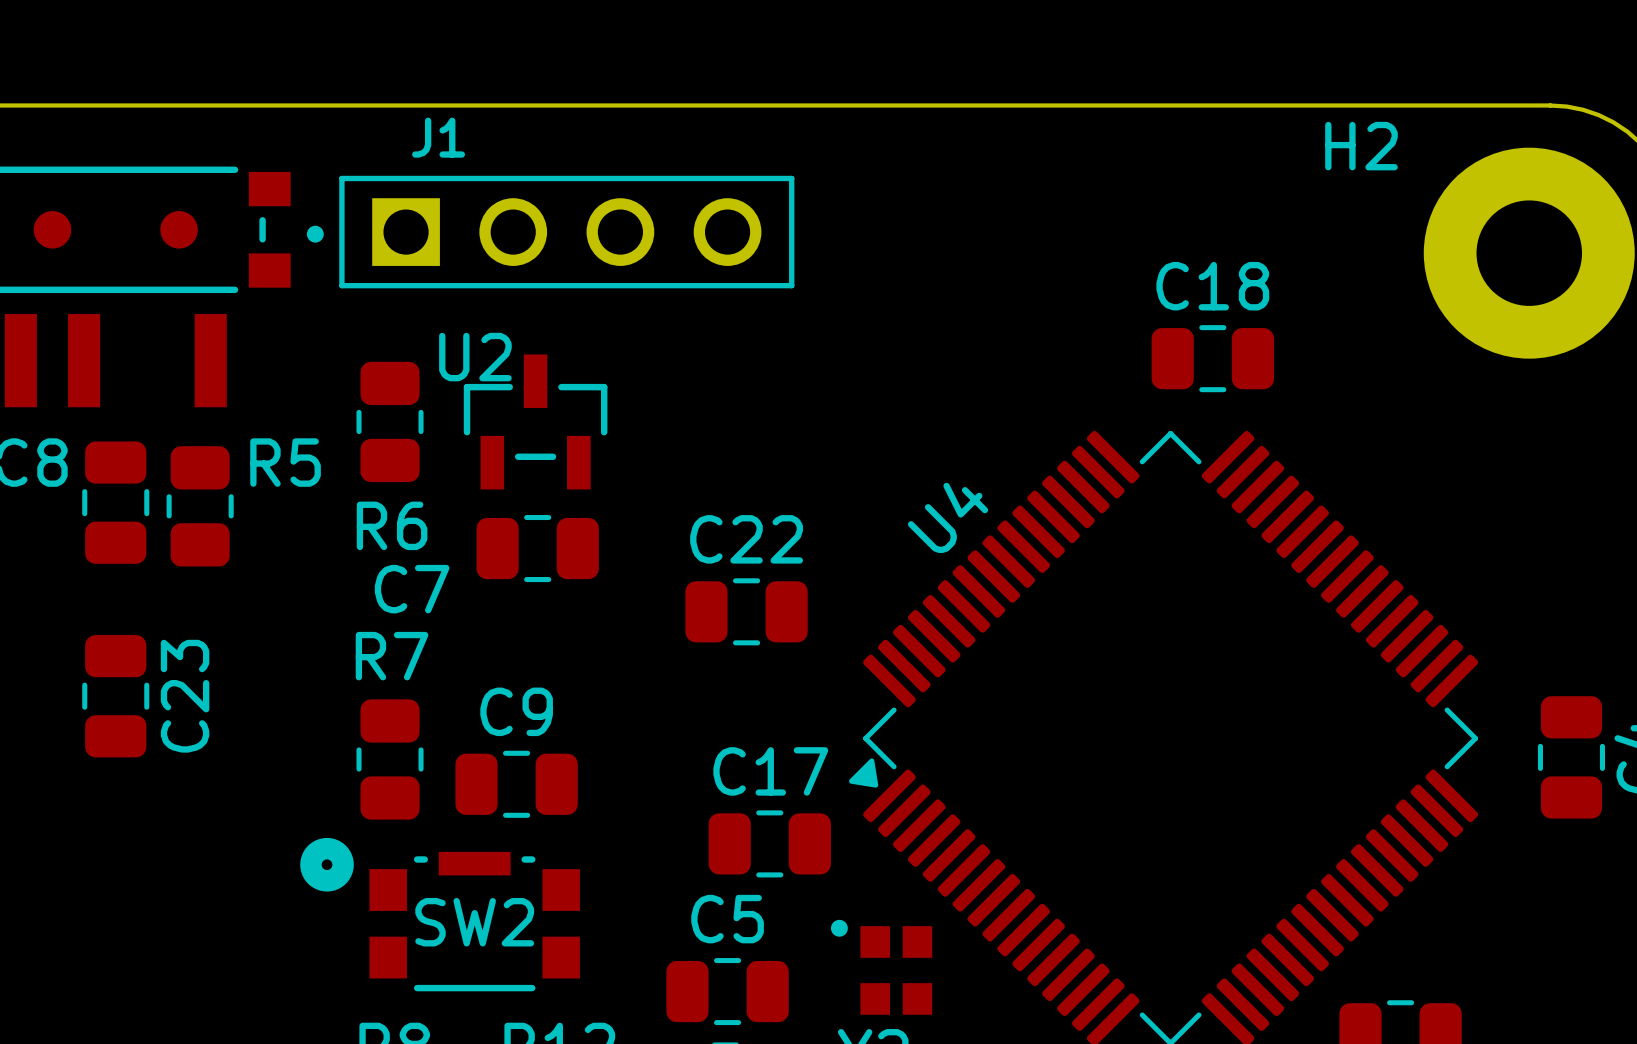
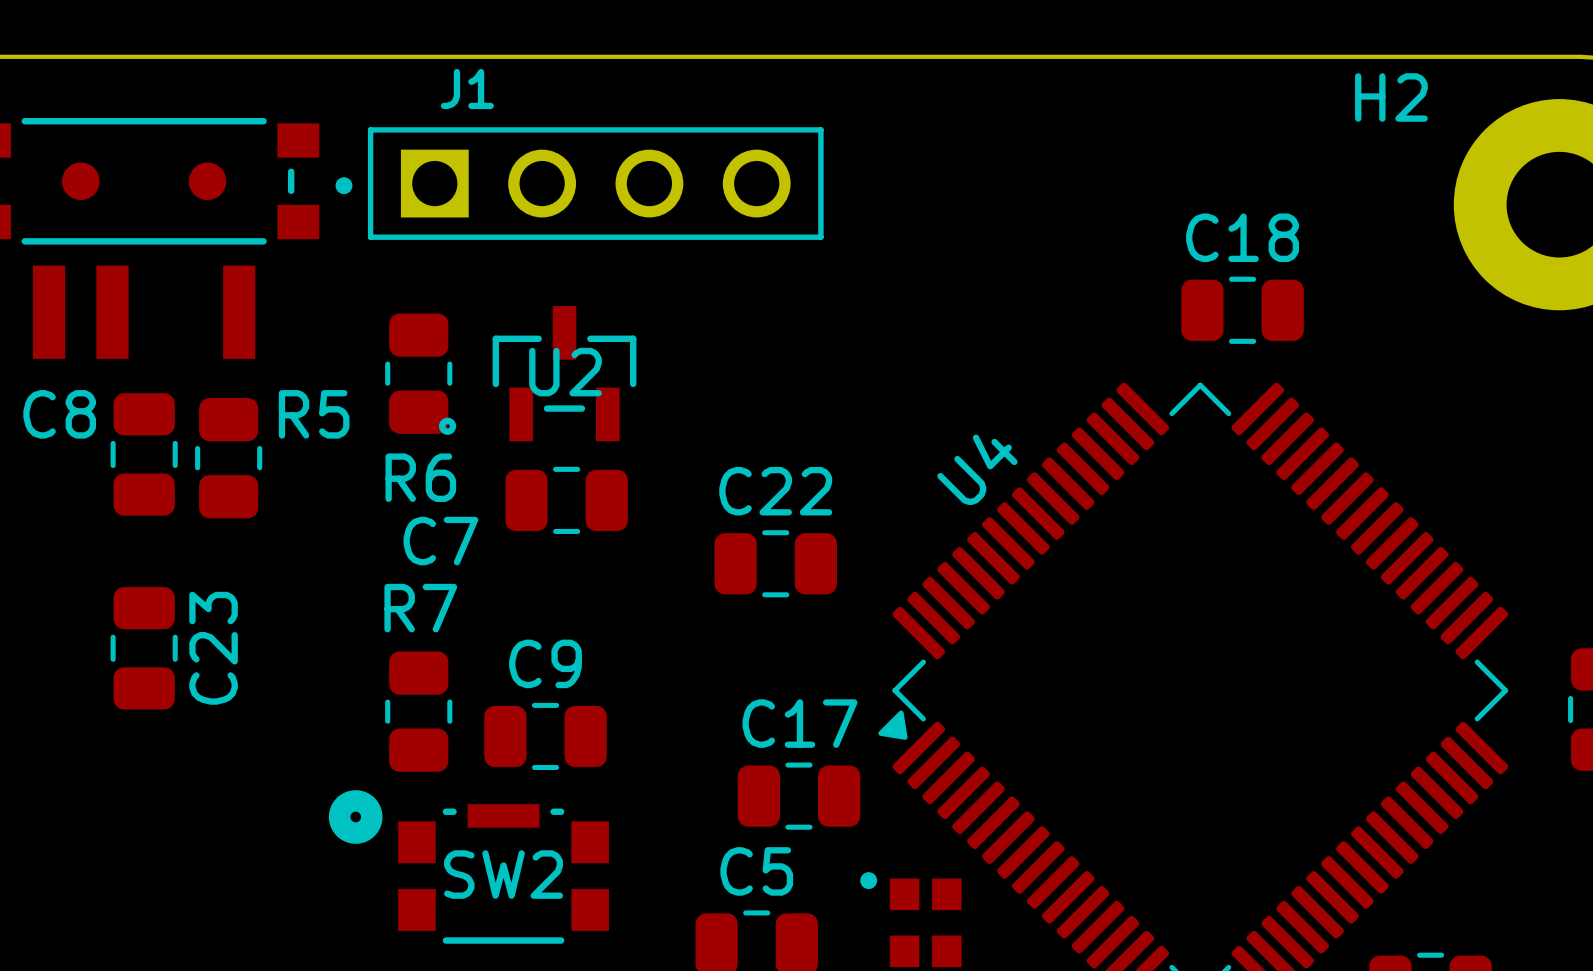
U2 footprint: [463, 354, 608, 490] -> [438, 306, 637, 442]
U2 name position: U2 (475, 357) -> U2 (565, 372)

